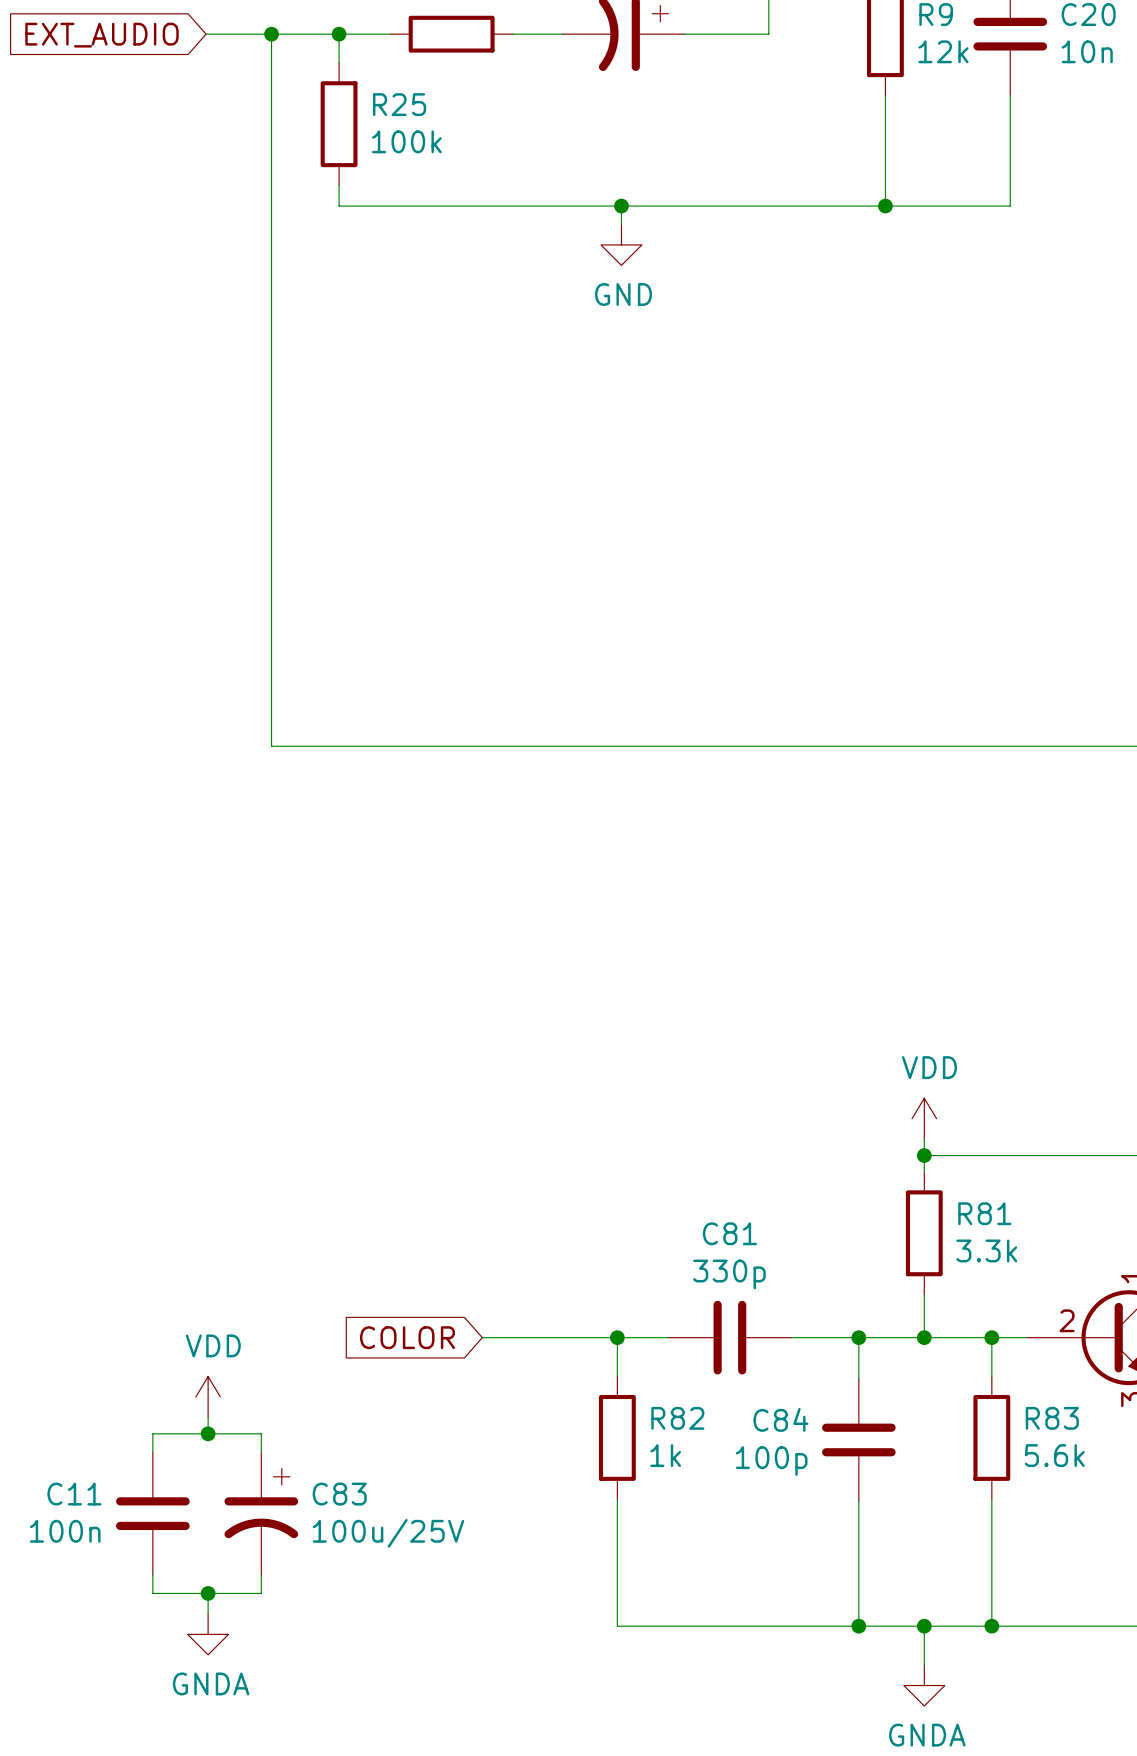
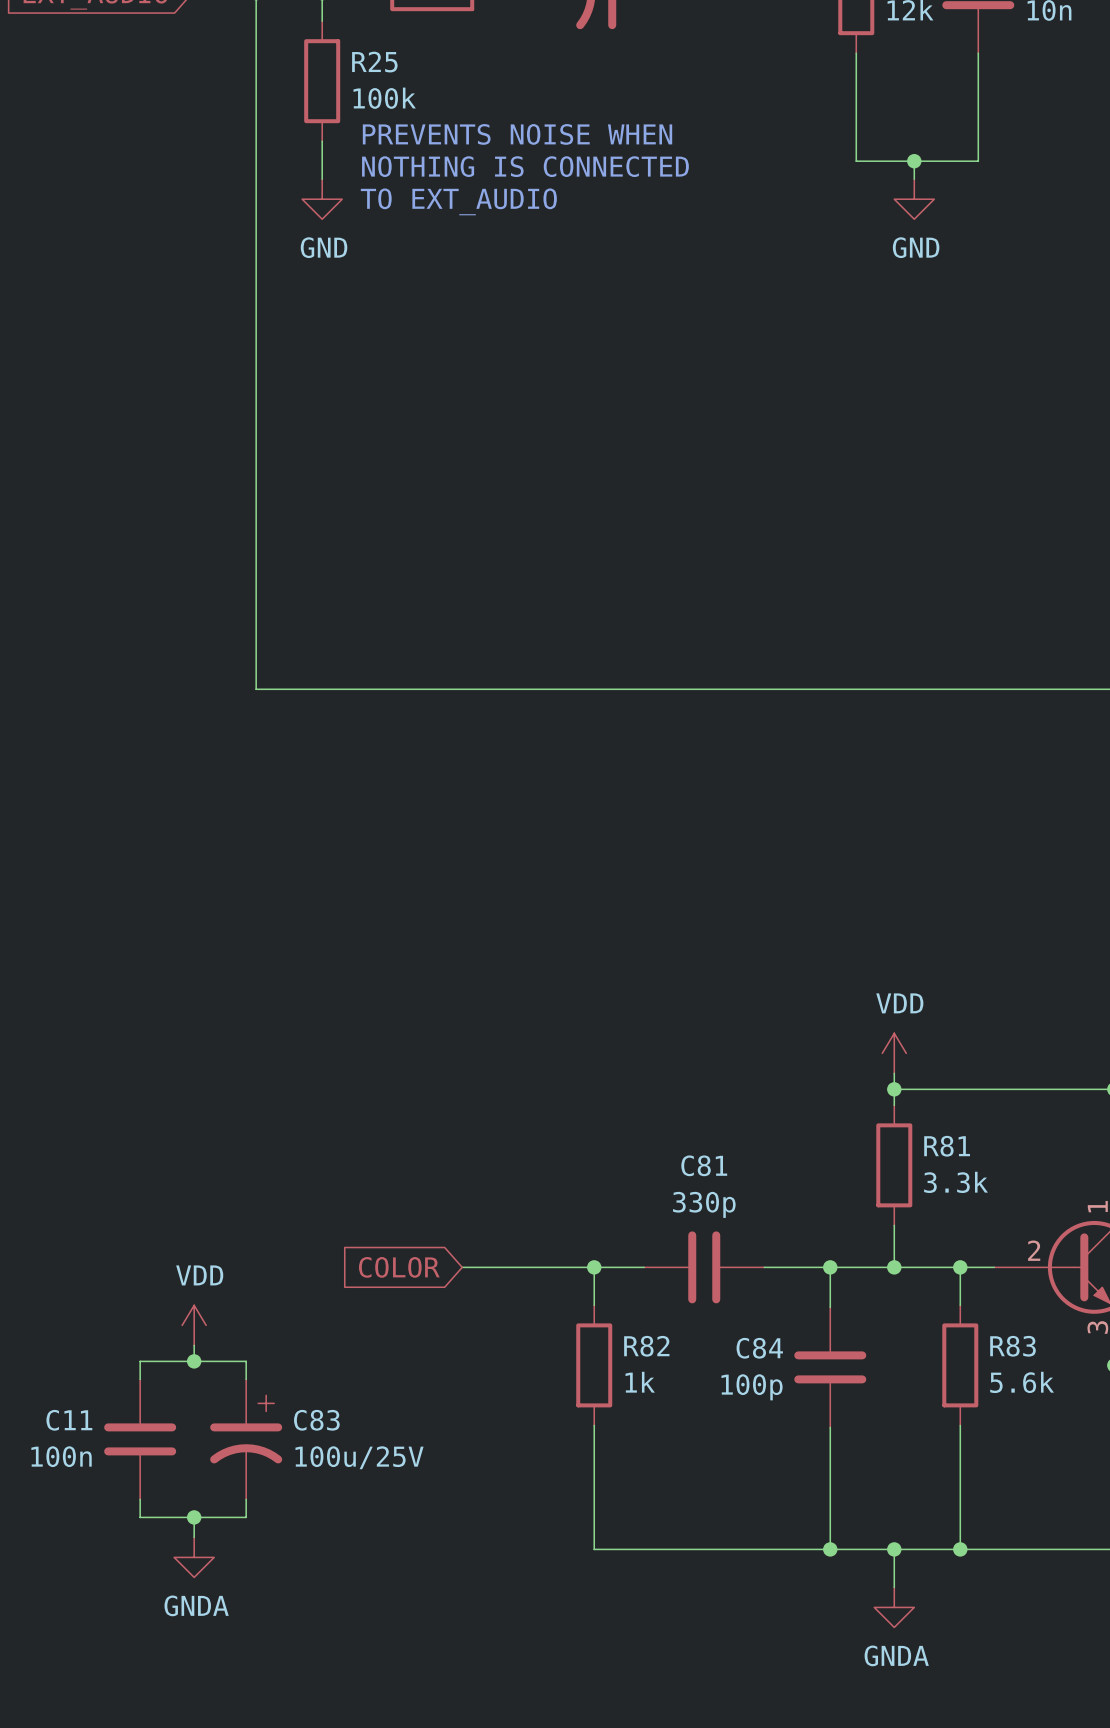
text: none -> PREVENTS NOISE WHEN (517, 134)
wire: (339, 206) (885, 206) -> (322, 161) (322, 179)
wire: (621, 206) (621, 224) -> (914, 161) (914, 179)
junction: (621, 206) -> none
junction position: (885, 206) -> (914, 161)
text: none -> NOTHING IS CONNECTED (525, 166)
power symbol: none -> GND (322, 199)
power symbol: GND (621, 244) -> none
power symbol: none -> GND (914, 199)
text: none -> TO EXT_AUDIO (458, 201)

